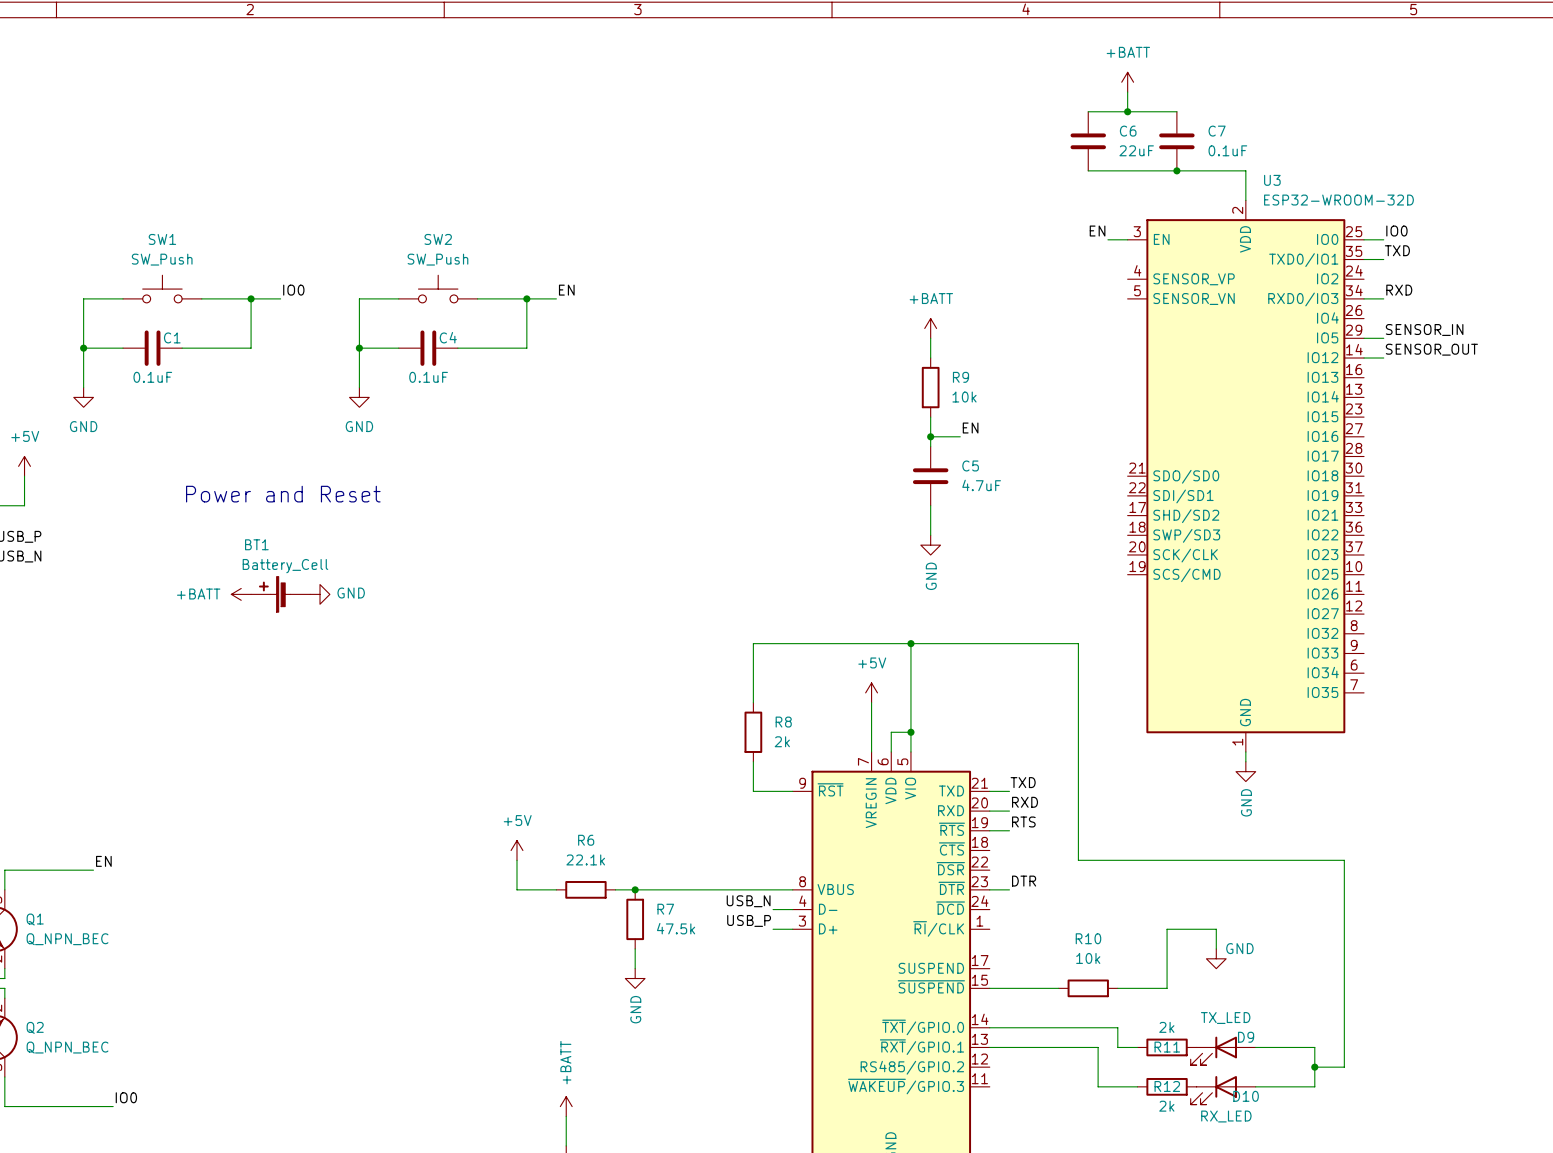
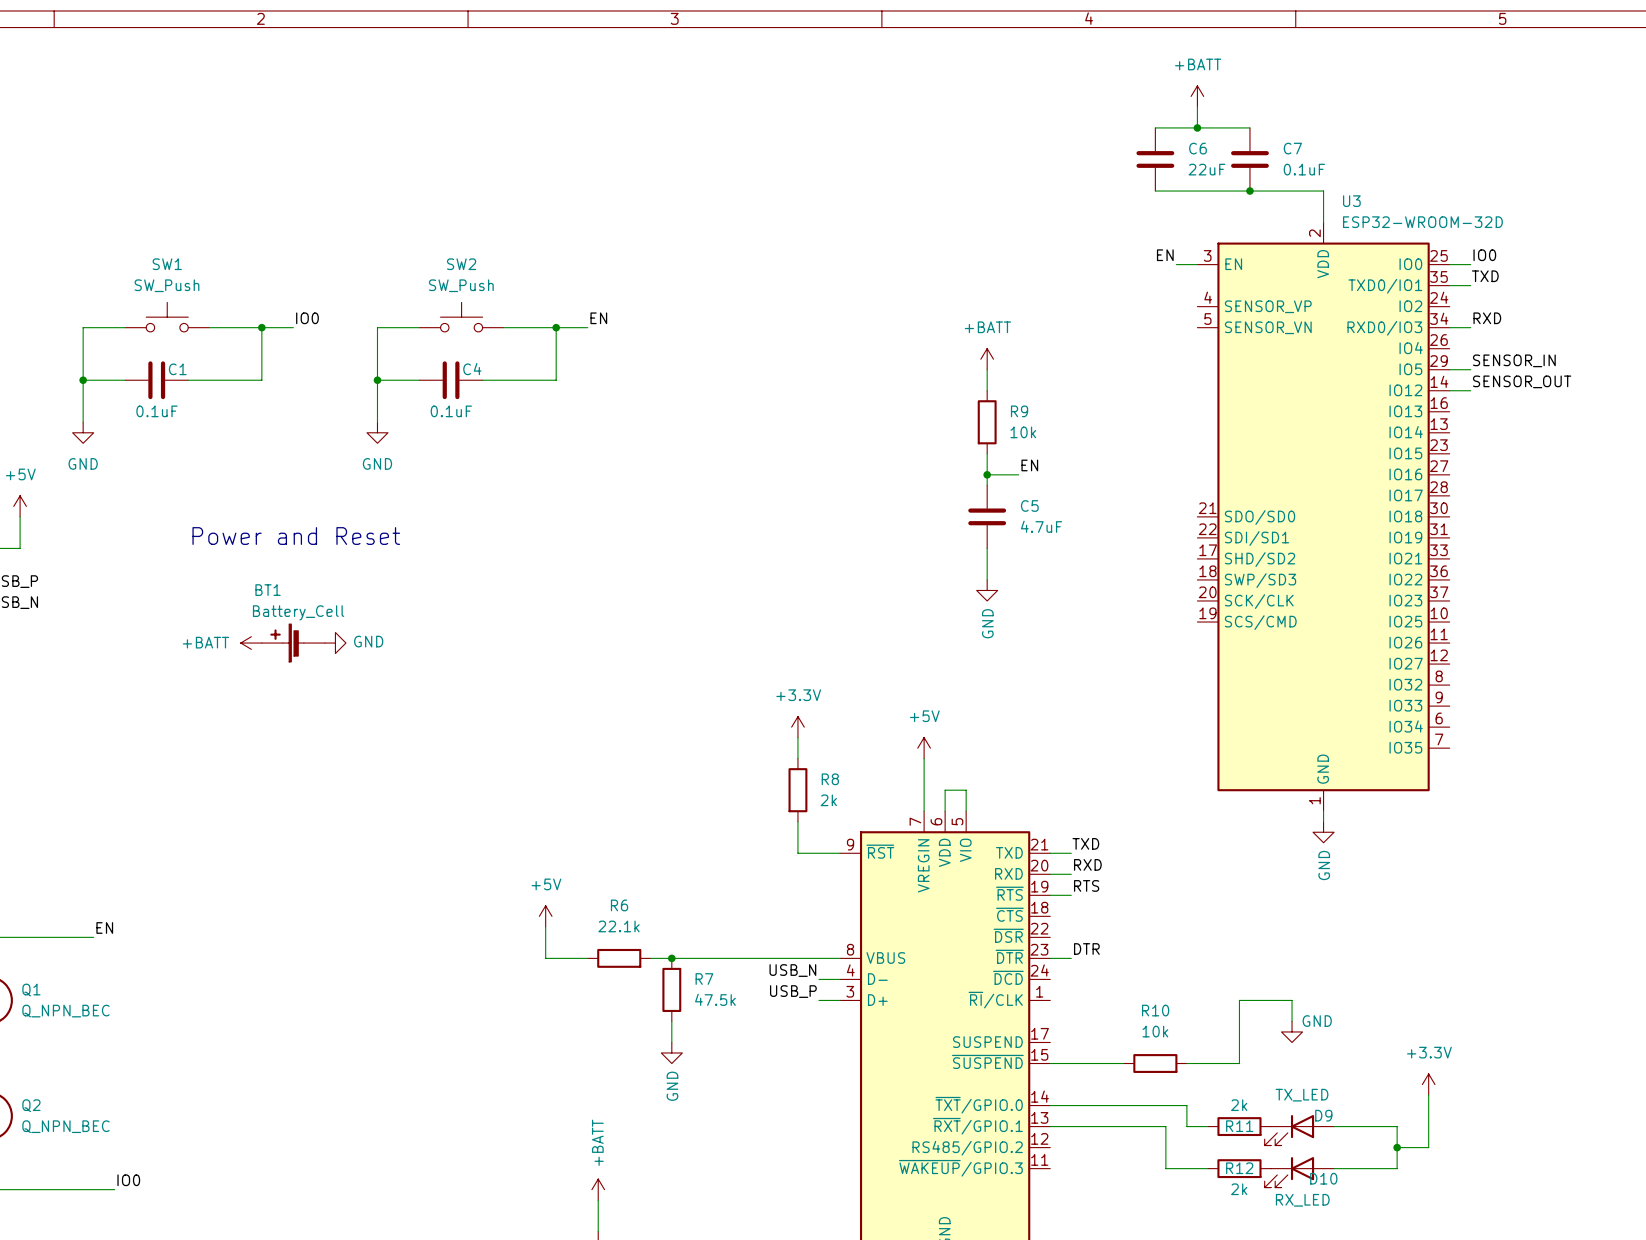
wire: (910, 643) (910, 732) -> none
junction: (910, 643) -> none
power symbol: none -> +3.3V (797, 727)
wire: (753, 683) (753, 643) (1078, 643) (1078, 860) (1344, 860) (1344, 1017) -> none
junction: (910, 732) -> none
power symbol: none -> +3.3V (1428, 1084)

